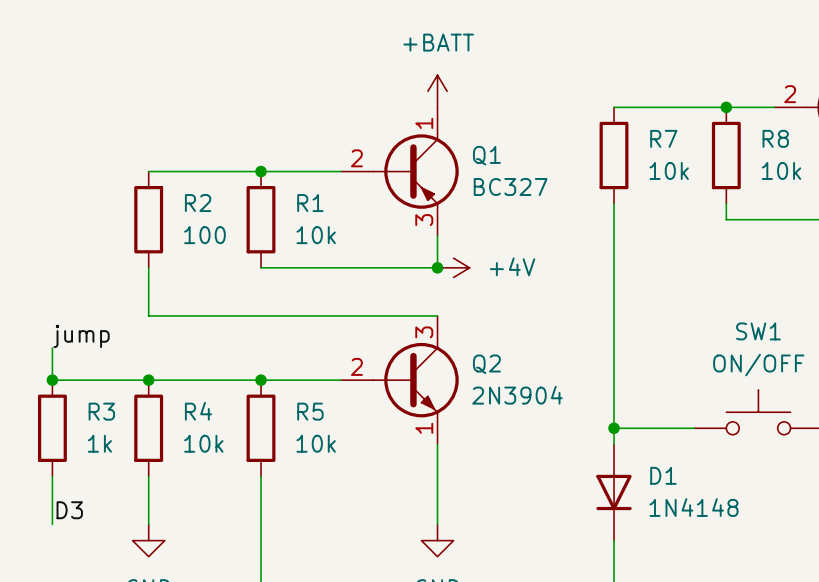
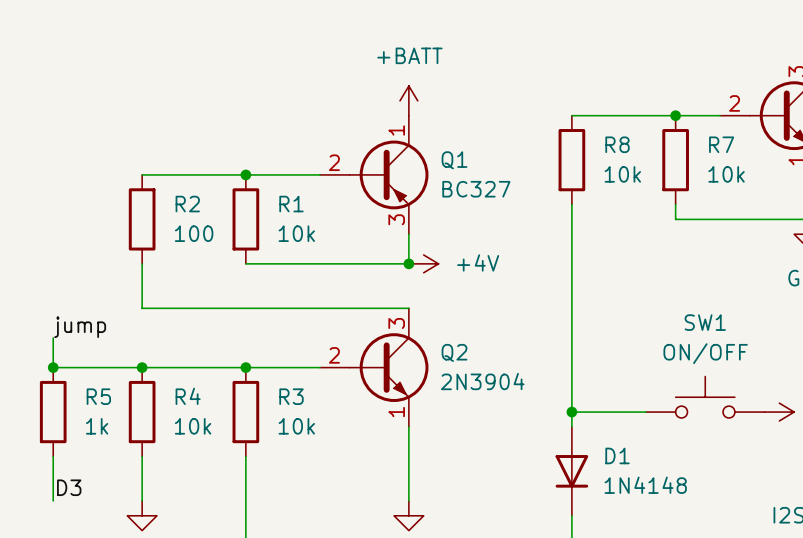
R7 name: R7 (663, 138) -> R8 (617, 144)
R8 name: R8 (775, 138) -> R7 (721, 144)
R3 name: R3 (101, 411) -> R5 (98, 396)
R5 name: R5 (310, 411) -> R3 (291, 396)

